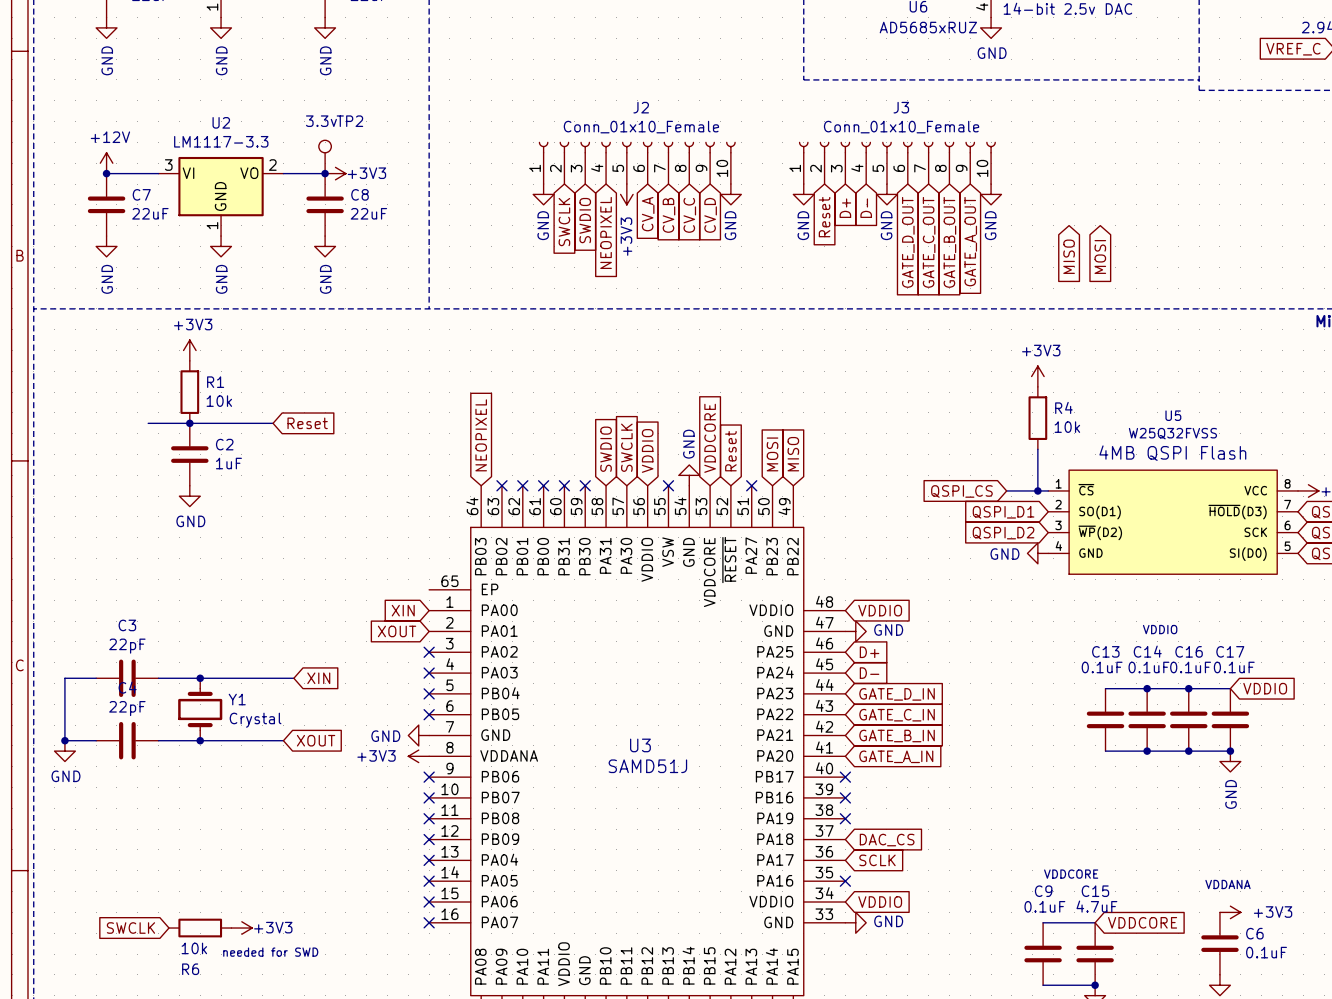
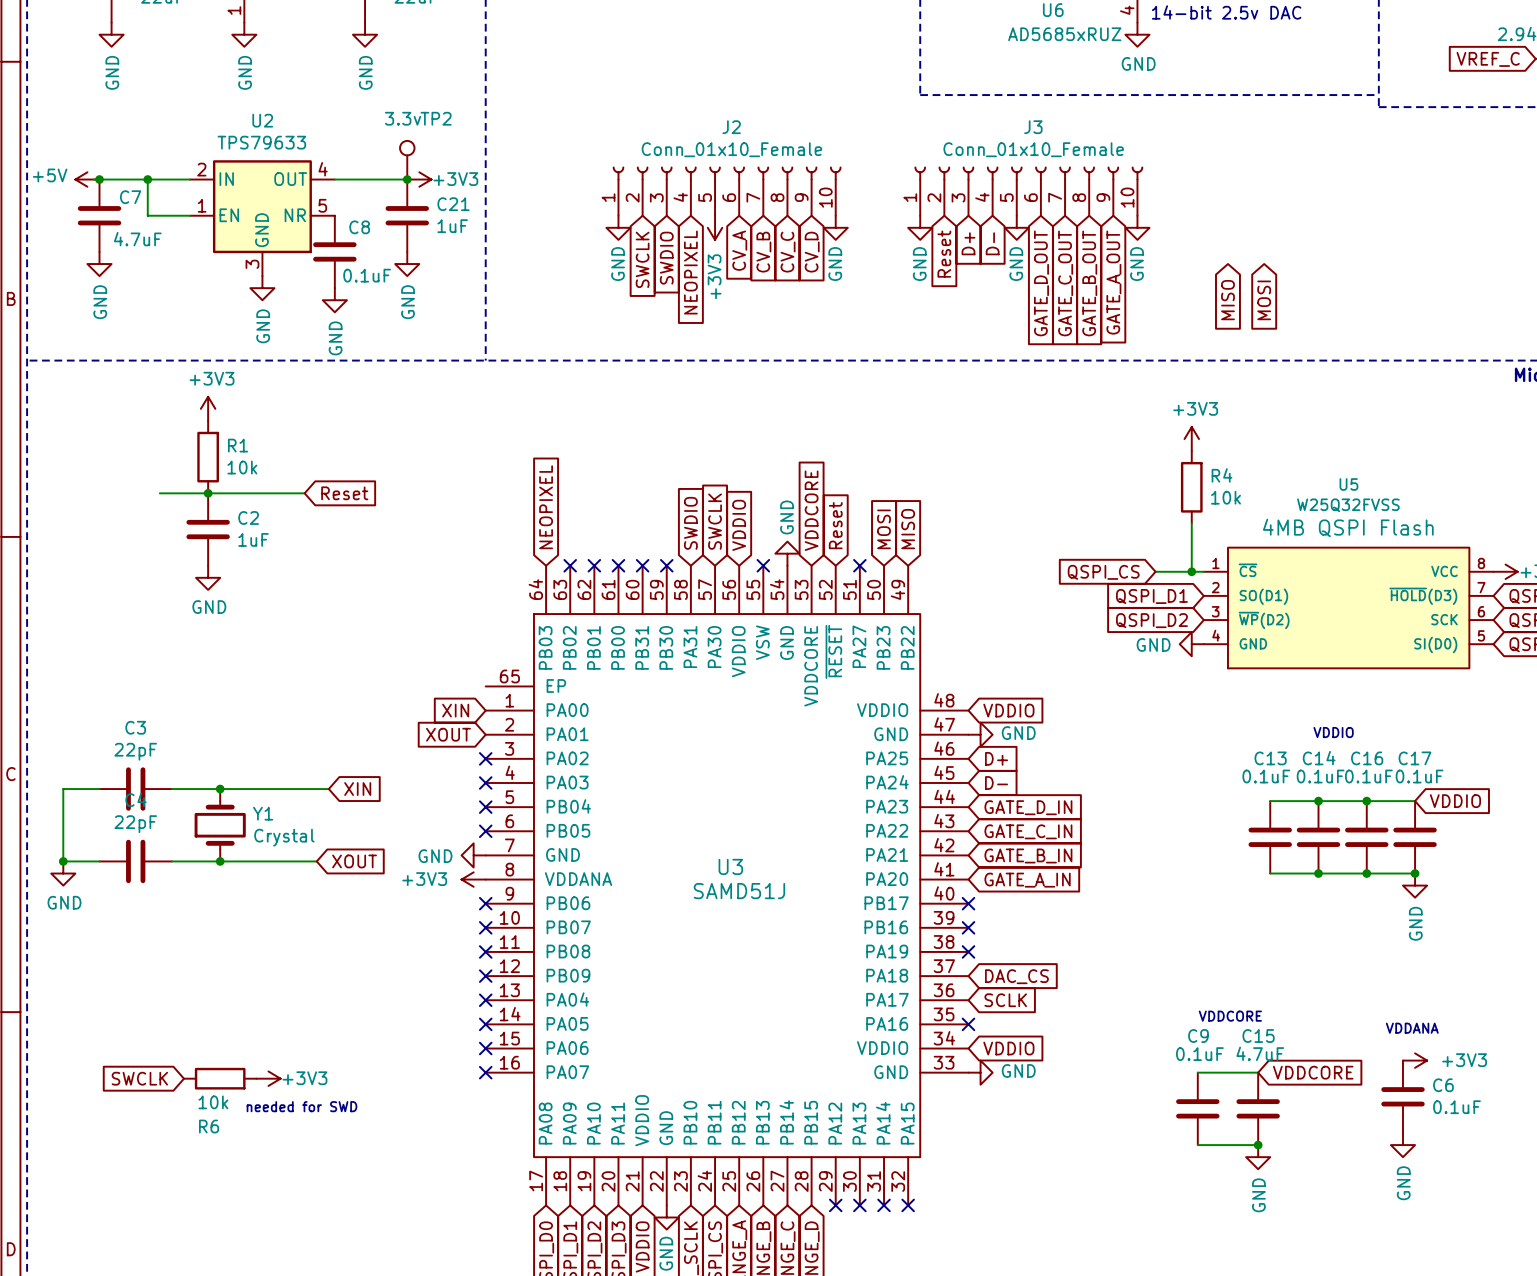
U2 value: LM1117-3.3 (221, 141) -> TPS79633 (261, 142)
power symbol: none -> +5V (87, 179)
wire: none -> (93, 179) (190, 179)
junction: none -> (99, 179)
wire: none -> (147, 179) (147, 215) (190, 215)
junction: none -> (147, 179)
wire: none -> (334, 179) (407, 179)
U2 symbol: [158, 156, 284, 237] -> [190, 160, 335, 277]
TP2 position: (325, 156) -> (407, 160)
power symbol: +12V (106, 163) -> none
wire: (106, 173) (158, 173) -> none
junction: (106, 173) -> none
wire: (283, 173) (325, 173) -> none
junction position: (325, 173) -> (407, 179)
power symbol position: +3V3 (335, 173) -> +3V3 (419, 179)
C21: none -> 1uF (407, 215)
C7 name position: C7 (141, 194) -> C7 (130, 197)
C8 name position: C8 (360, 194) -> C8 (359, 227)
C7 position: (106, 204) -> (99, 215)
C8 position: (325, 204) -> (334, 251)
C7 value: 22uF (150, 213) -> 4.7uF (137, 239)
C8 value: 22uF (368, 213) -> 0.1uF (367, 275)
power symbol: none -> GND (407, 264)
power symbol position: GND (106, 246) -> GND (99, 264)
power symbol position: GND (221, 246) -> GND (262, 288)
power symbol: GND (325, 246) -> none
power symbol: none -> GND (334, 300)

